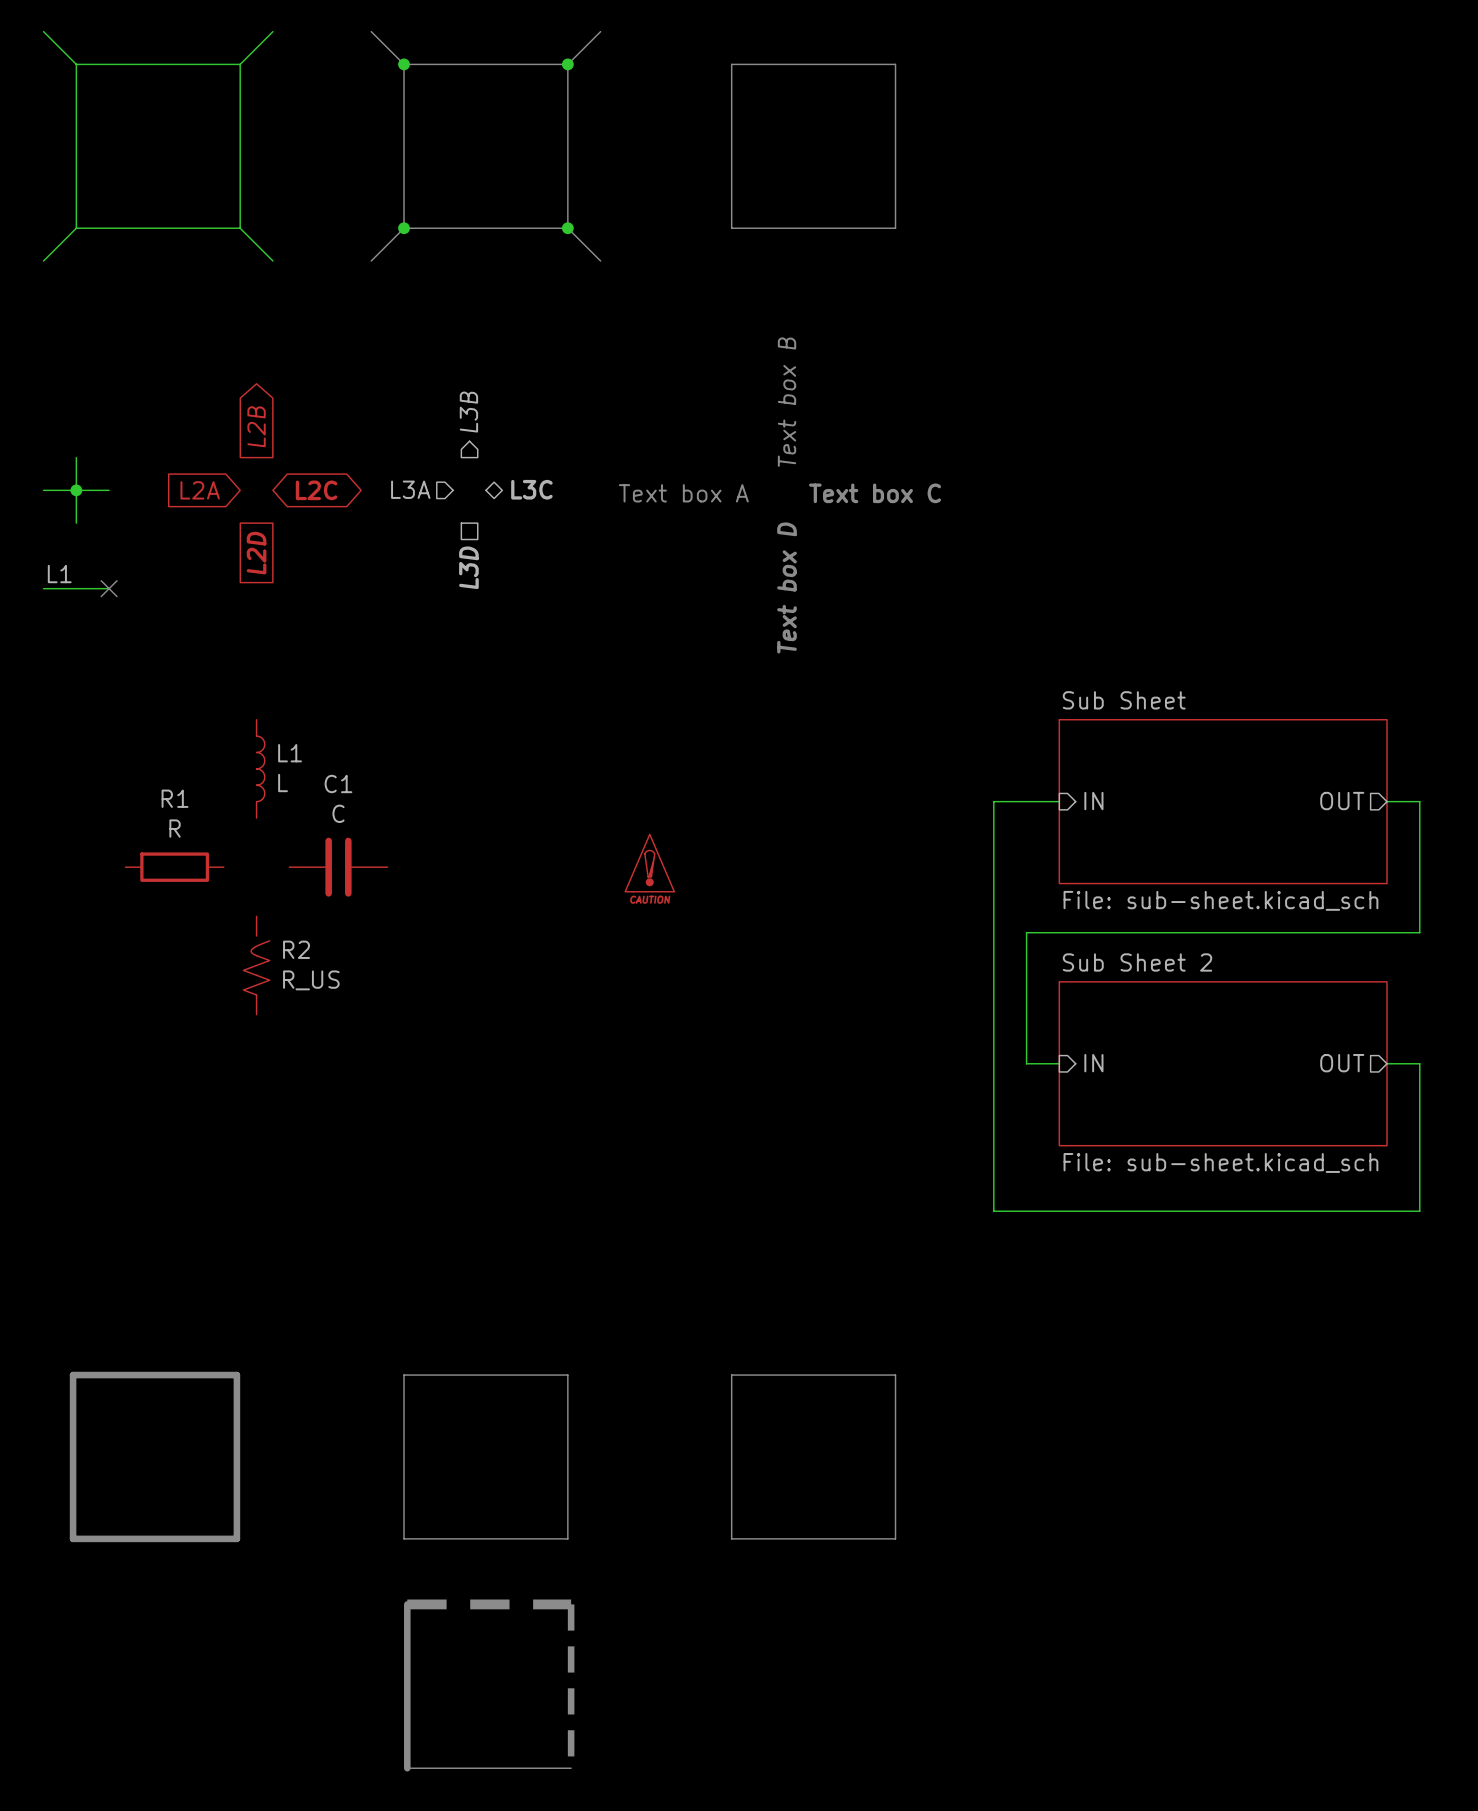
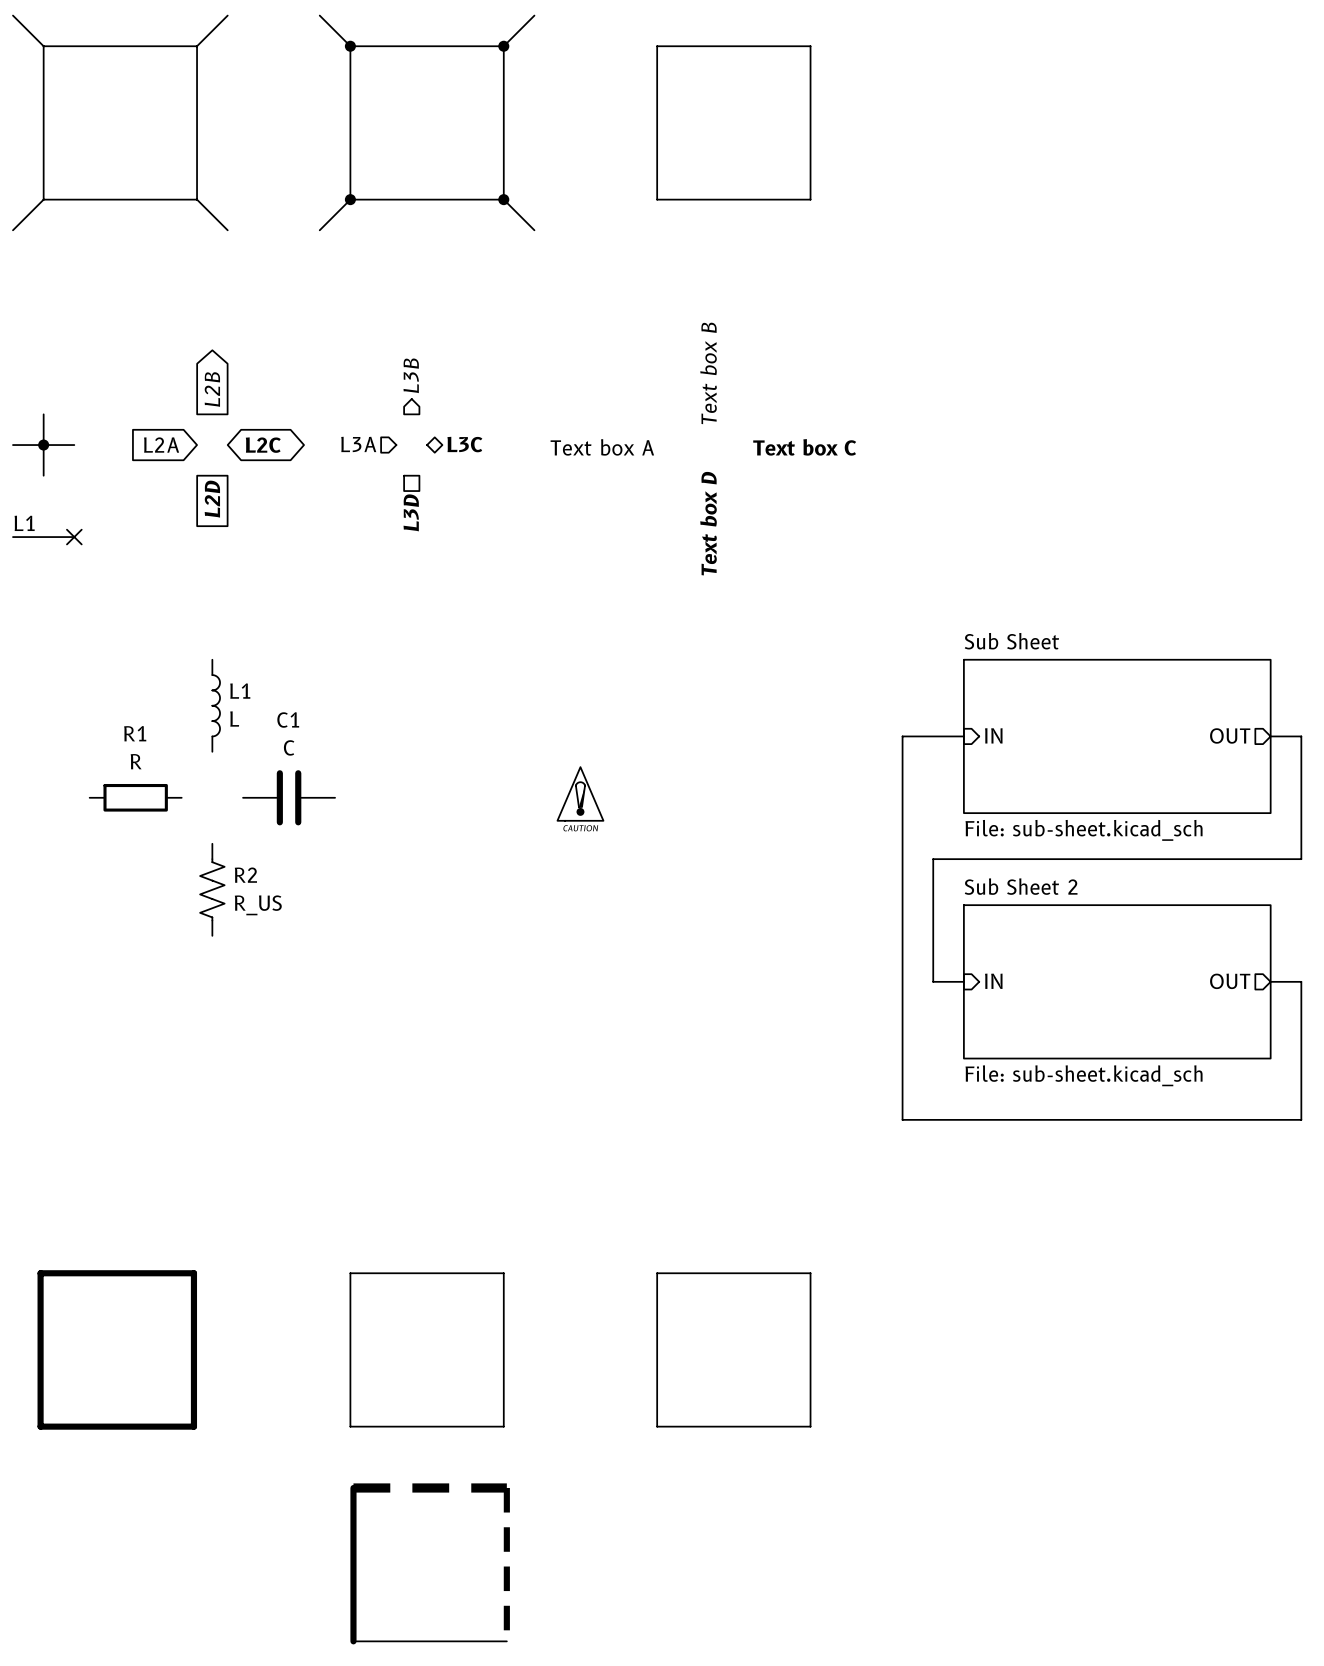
R2 symbol: [243, 916, 270, 1015] -> [200, 843, 225, 936]

